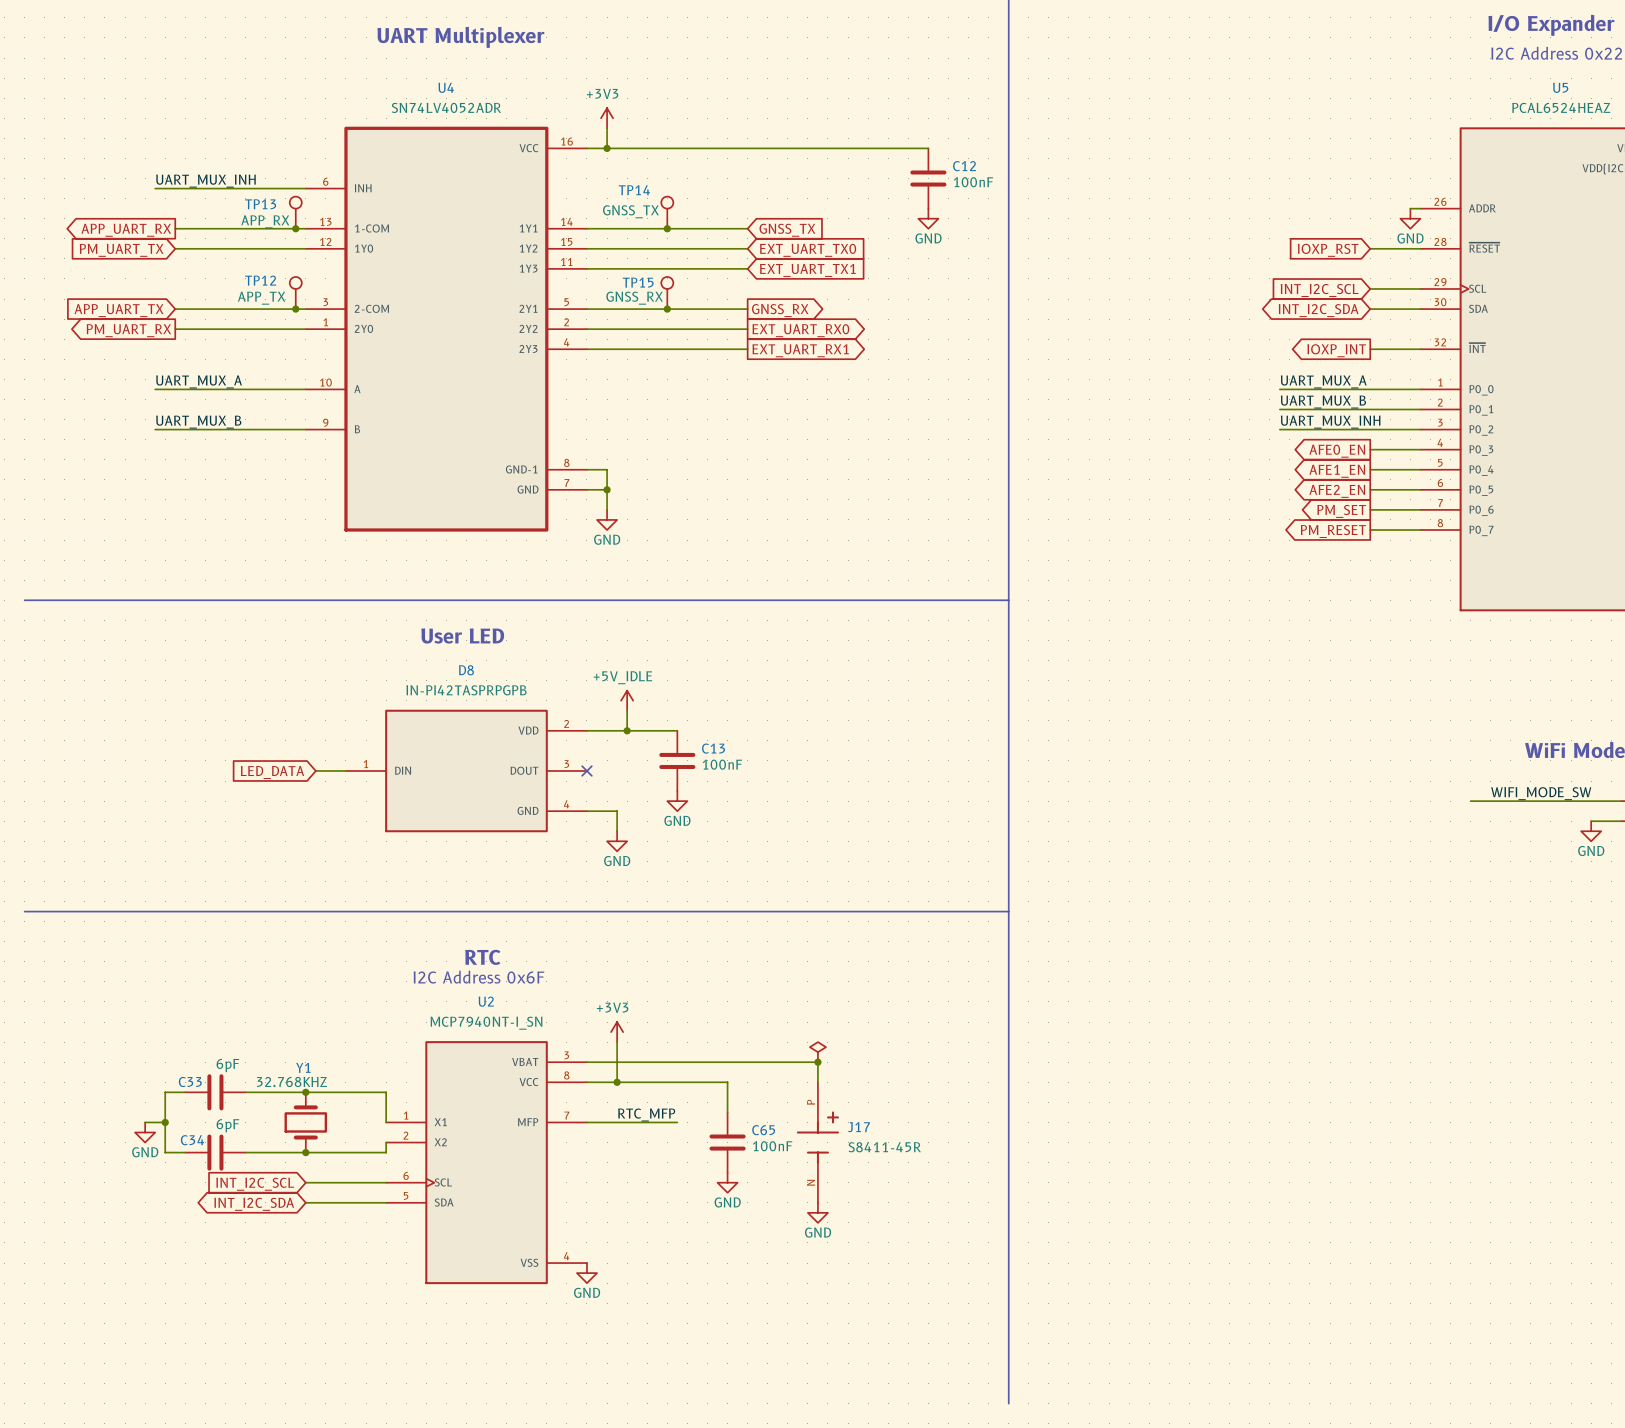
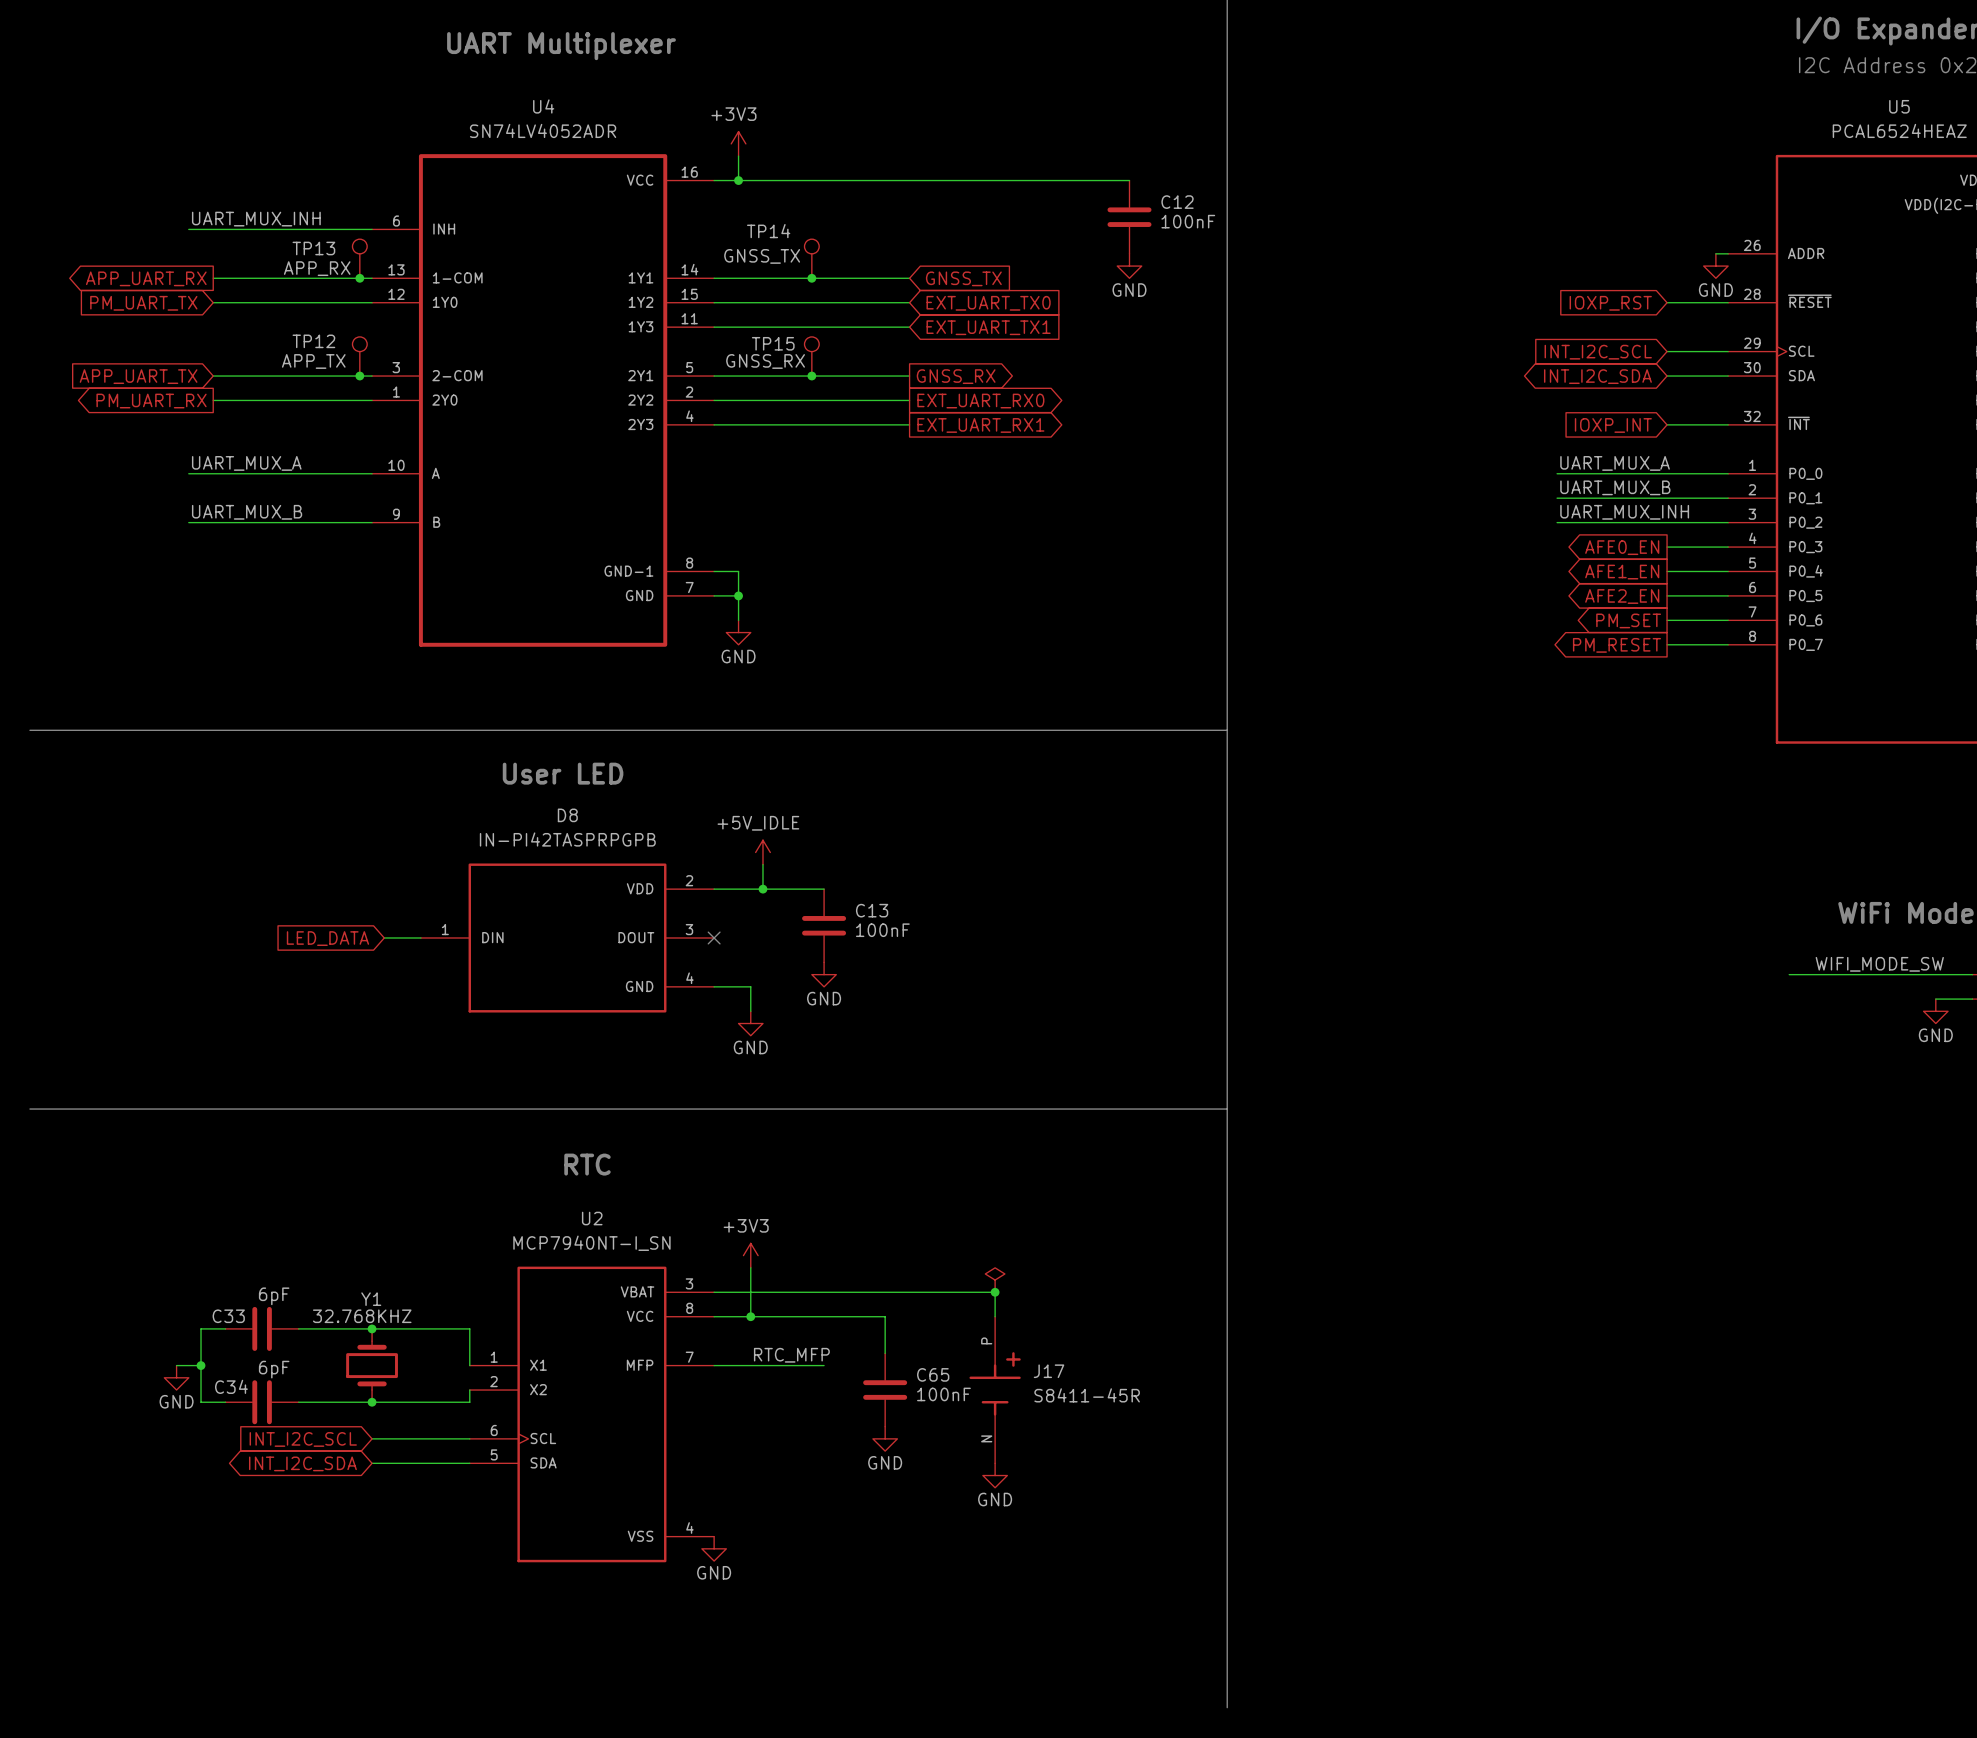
global label shape: output (1336, 350) -> input (1613, 425)
text: I2C Address 0x6F (478, 977) -> none

